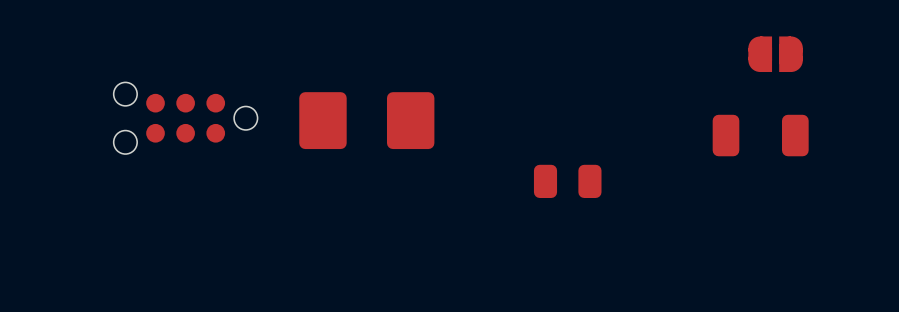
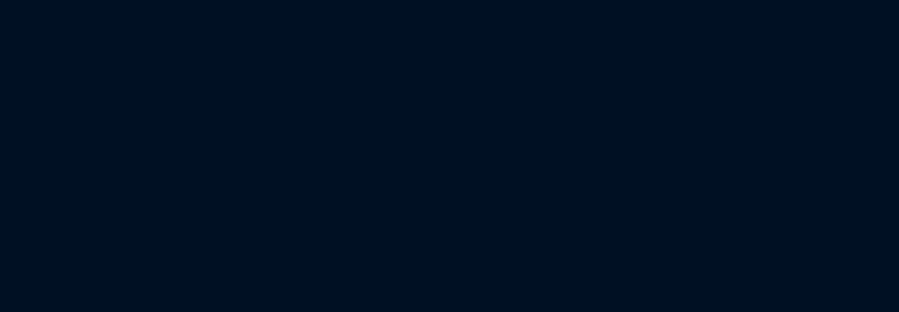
part: (775, 54) -> none
part: (185, 118) -> none
part: (366, 120) -> none
part: (760, 135) -> none
part: (567, 181) -> none

